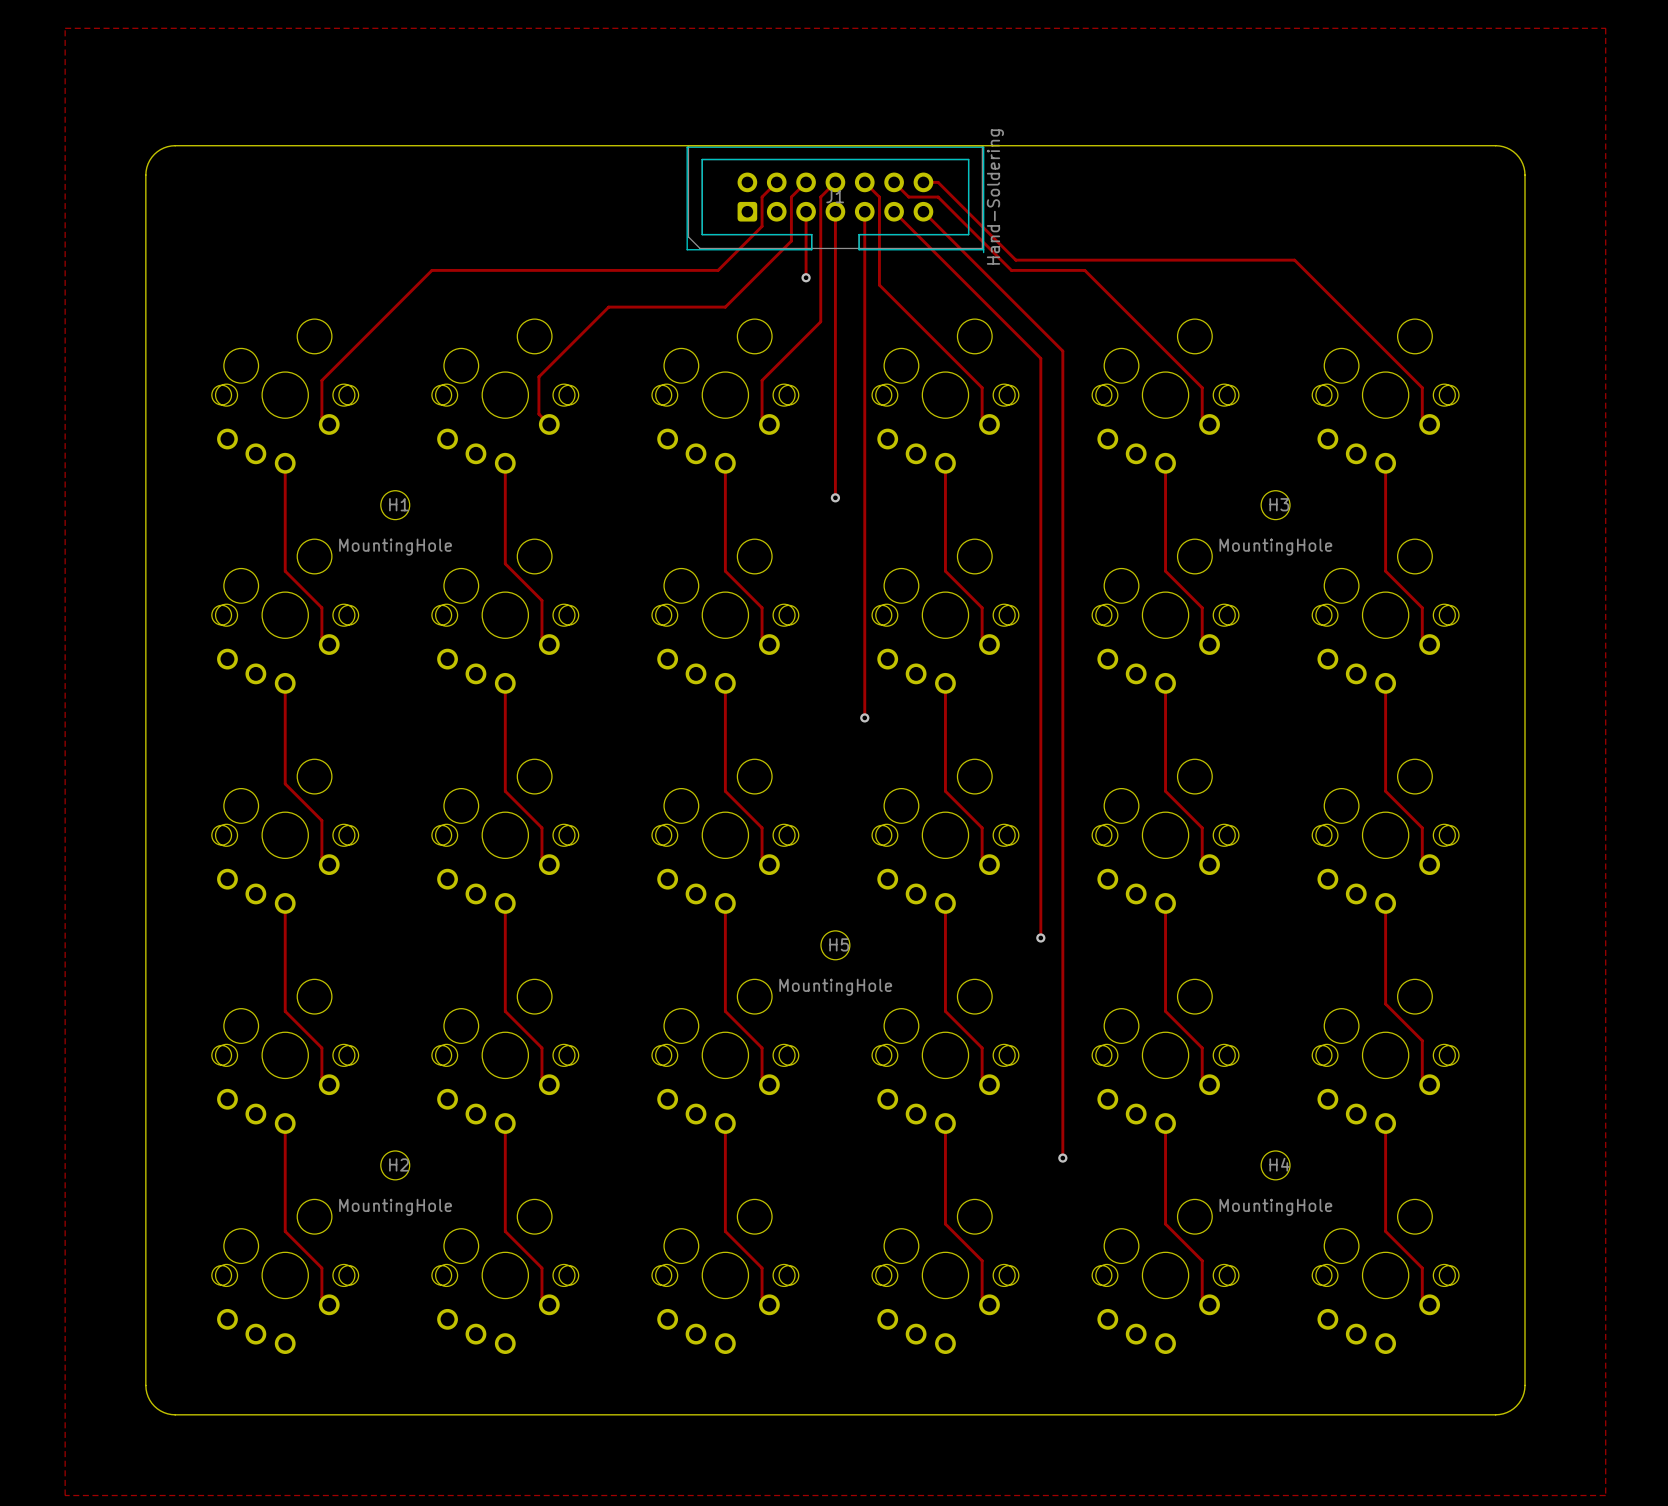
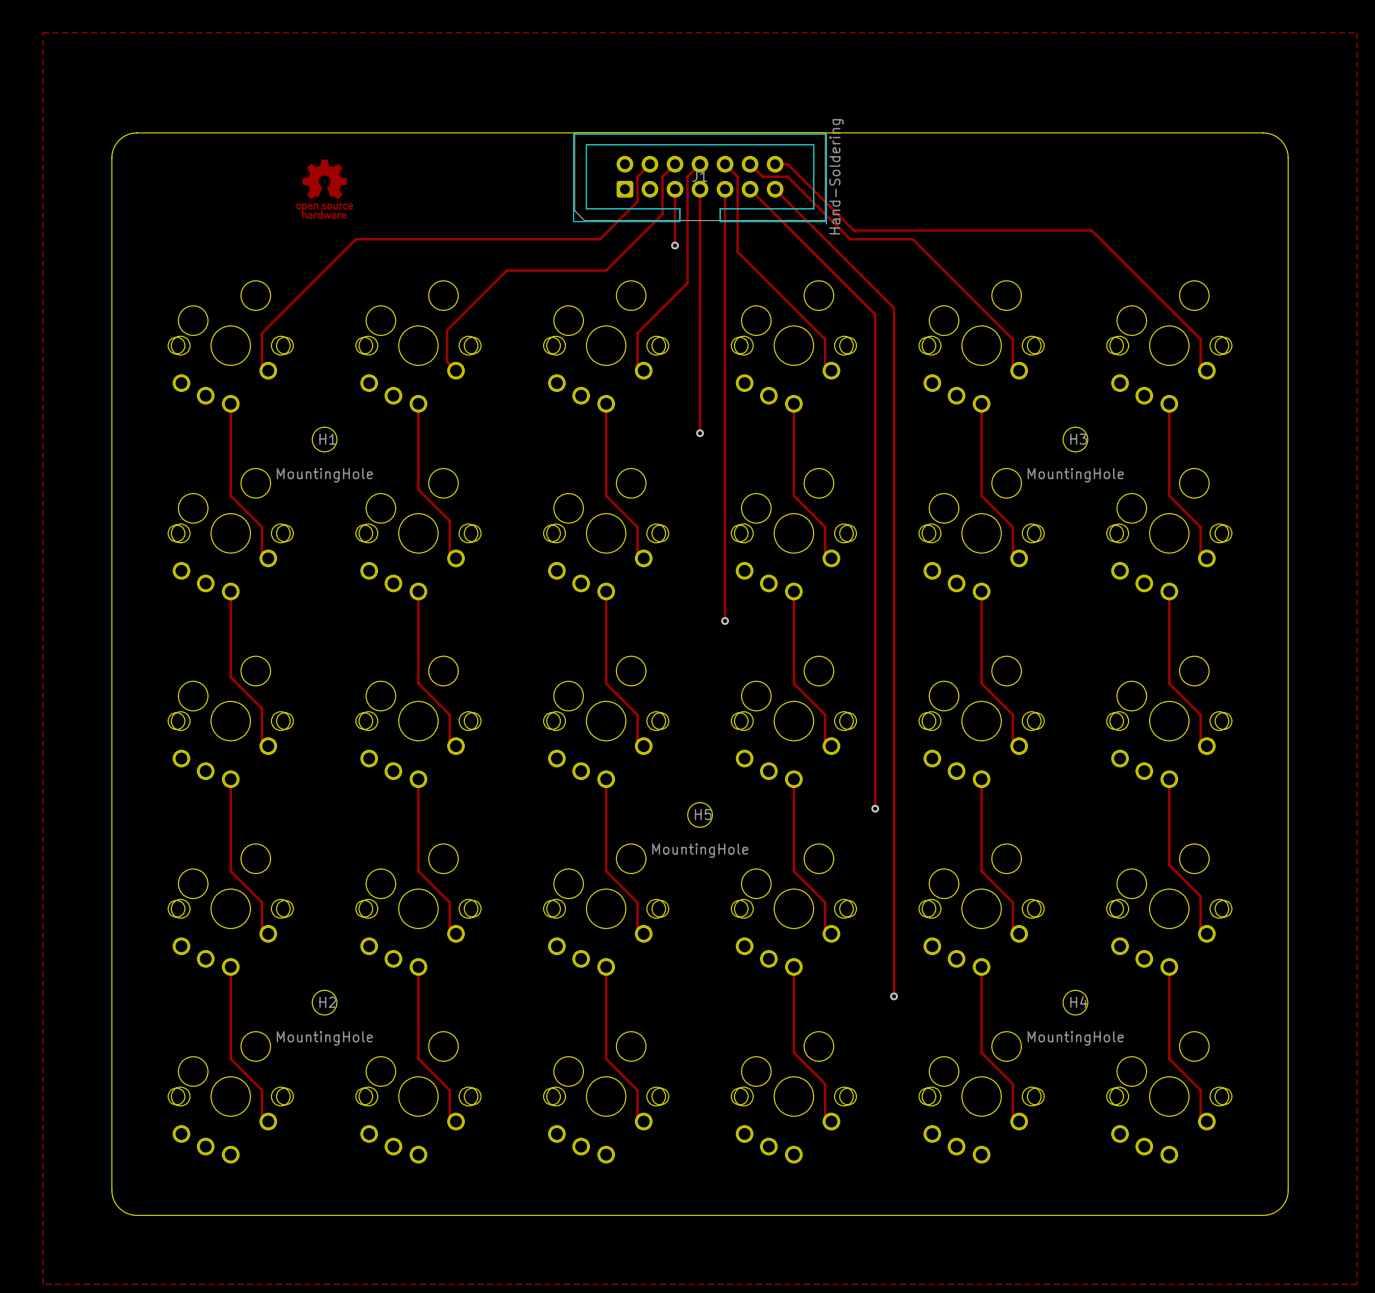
drawing: none -> [296, 159, 354, 220]

